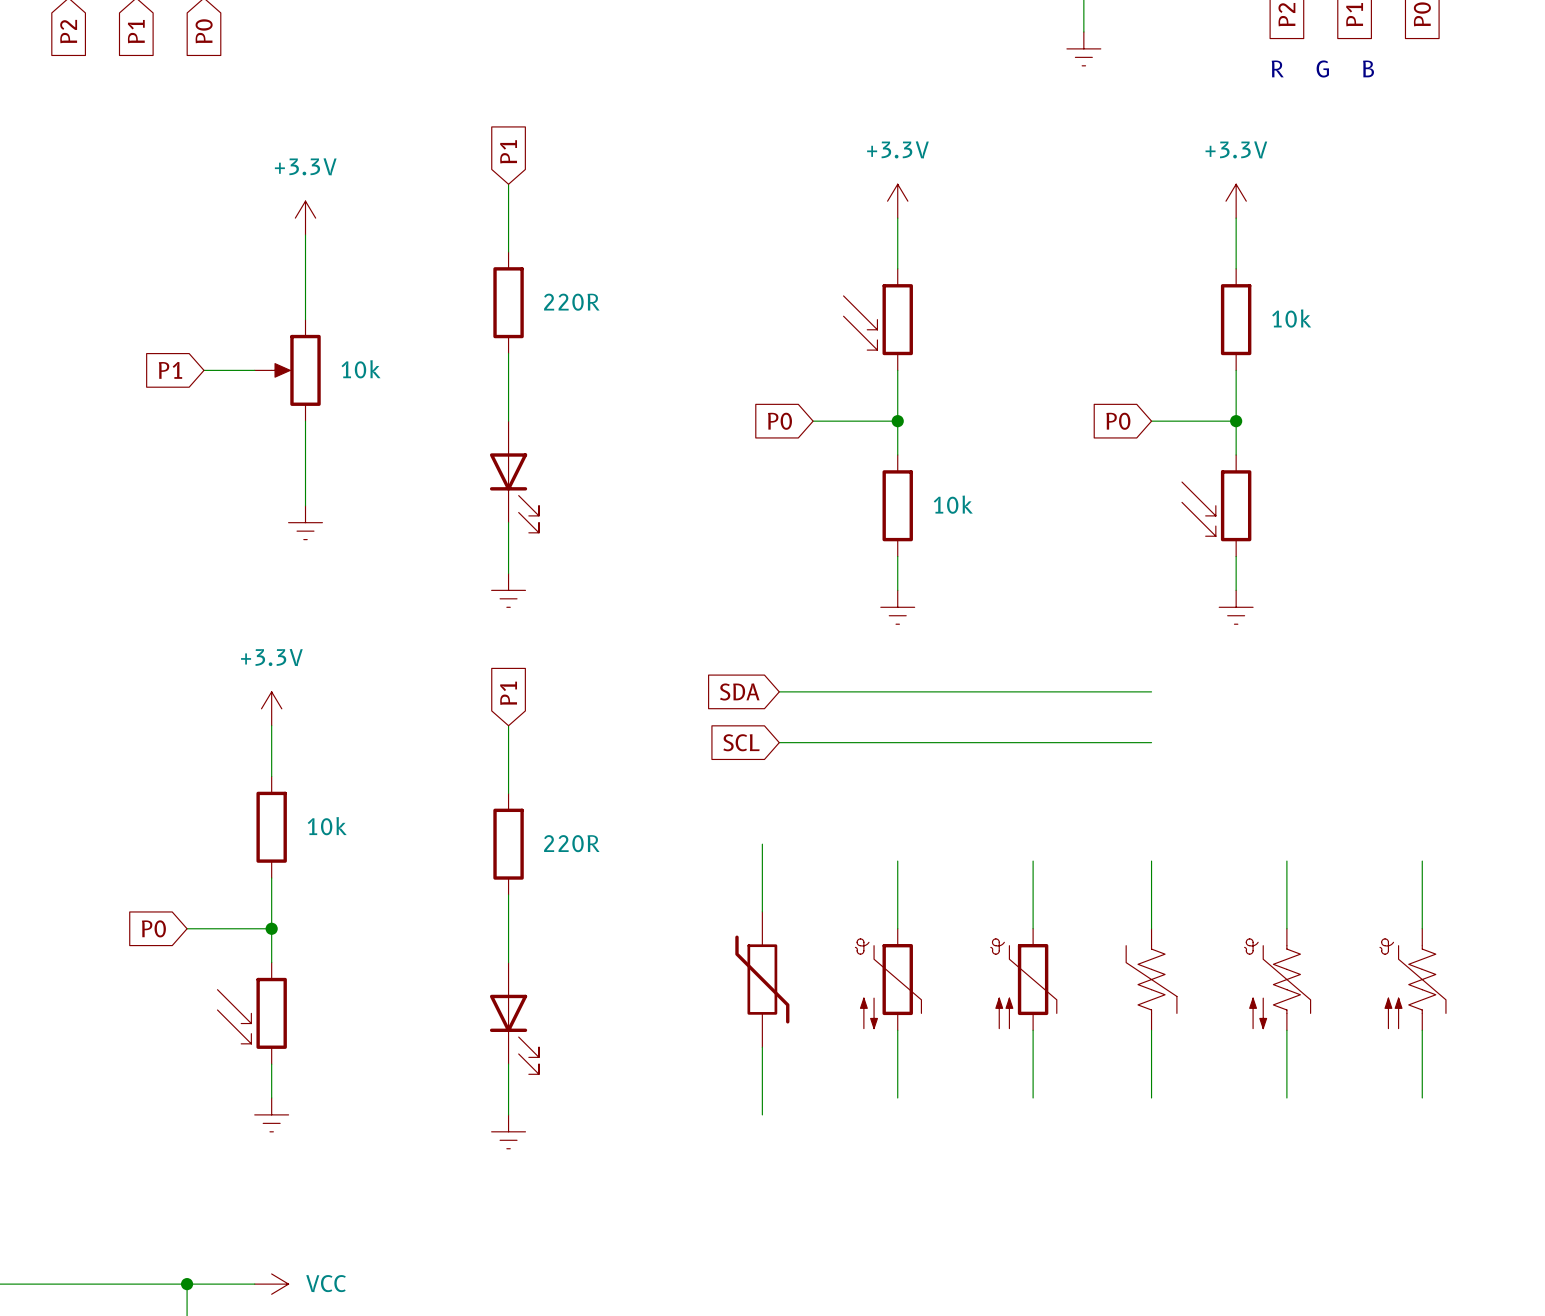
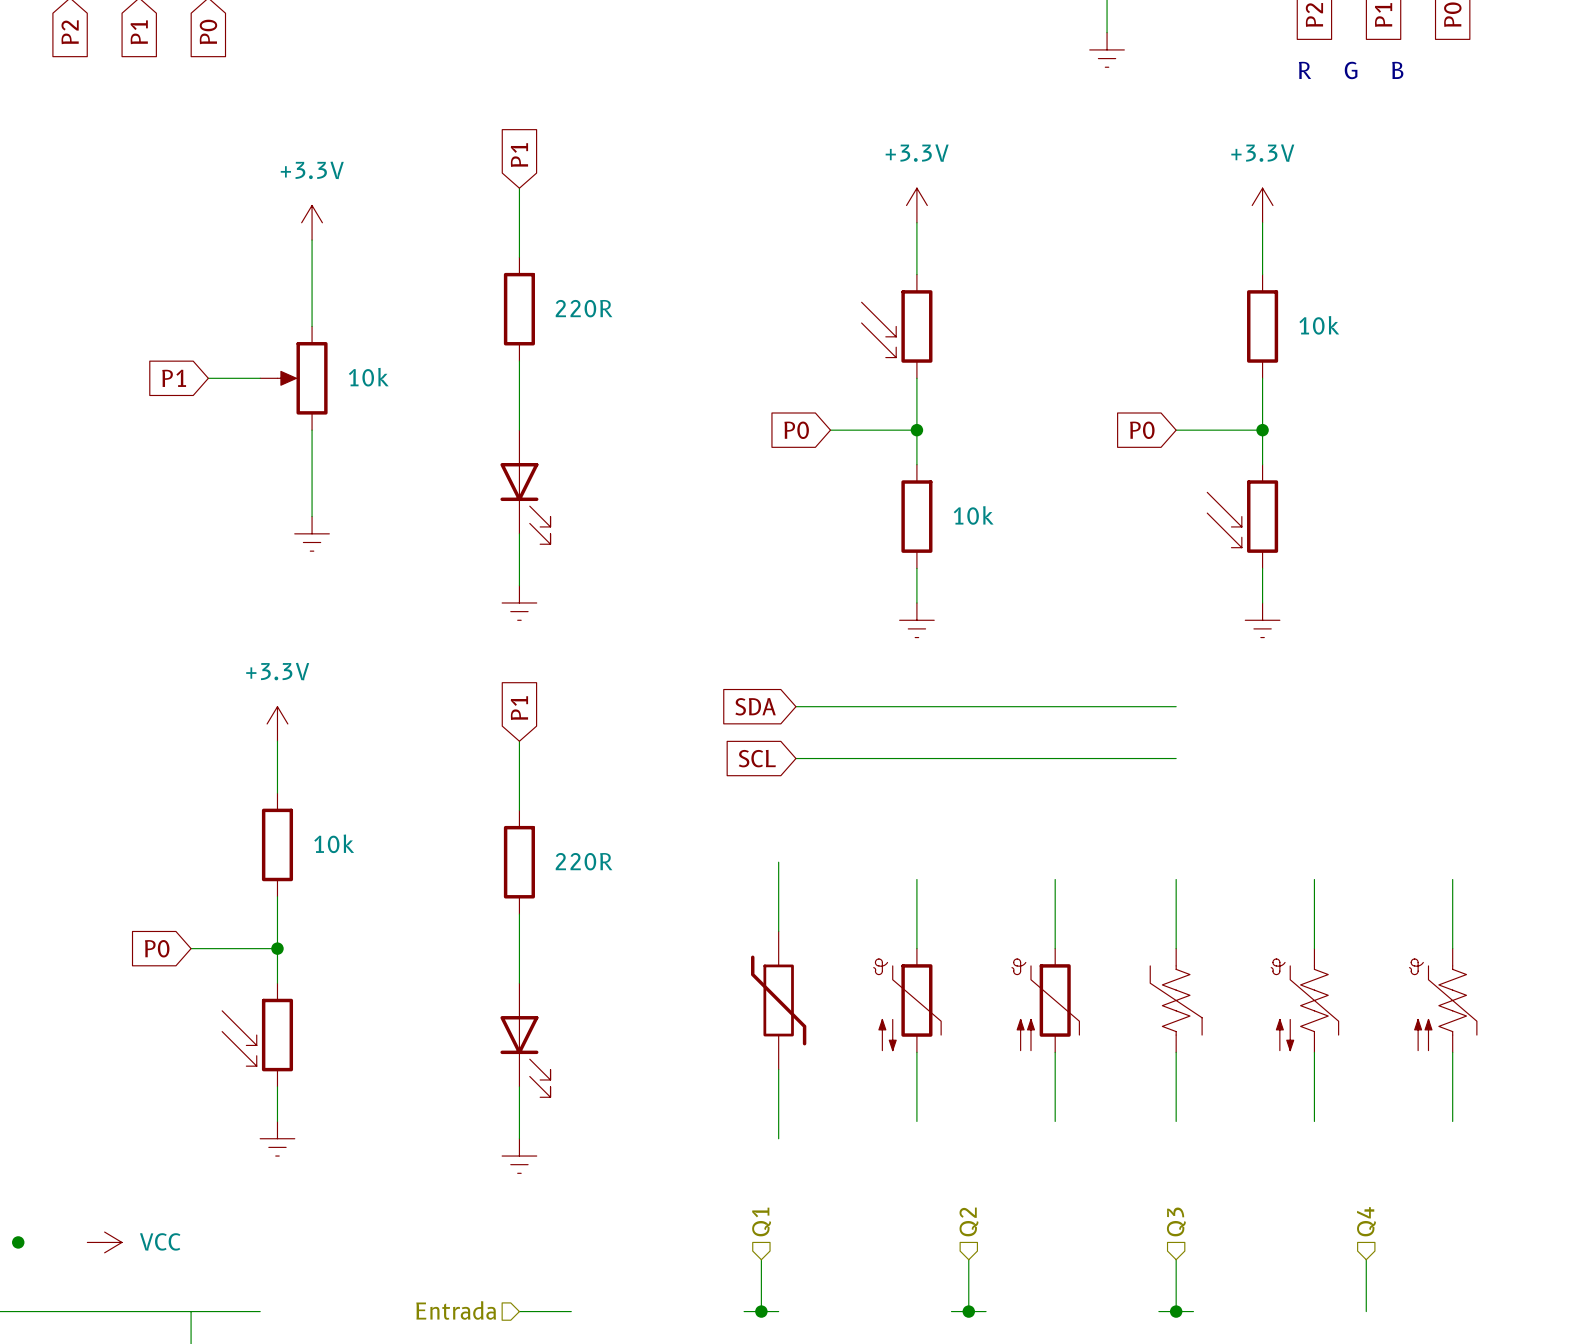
hierarchical label: none -> Q1 (761, 1222)
hierarchical label: none -> Q2 (968, 1221)
hierarchical label: none -> Q3 (1176, 1221)
hierarchical label: none -> Q4 (1366, 1221)
junction: none -> (18, 1242)
wire: none -> (761, 1259) (761, 1311)
wire: none -> (968, 1259) (968, 1311)
wire: none -> (1176, 1259) (1176, 1311)
wire: none -> (1366, 1259) (1366, 1311)
hierarchical label: none -> Entrada (456, 1310)
junction: (187, 1284) -> none
power symbol position: VCC (271, 1284) -> VCC (104, 1242)
wire: none -> (519, 1311) (571, 1311)
wire: none -> (744, 1311) (778, 1311)
junction: none -> (761, 1311)
wire: none -> (951, 1311) (986, 1311)
junction: none -> (968, 1311)
wire: none -> (1158, 1311) (1193, 1311)
junction: none -> (1176, 1311)

